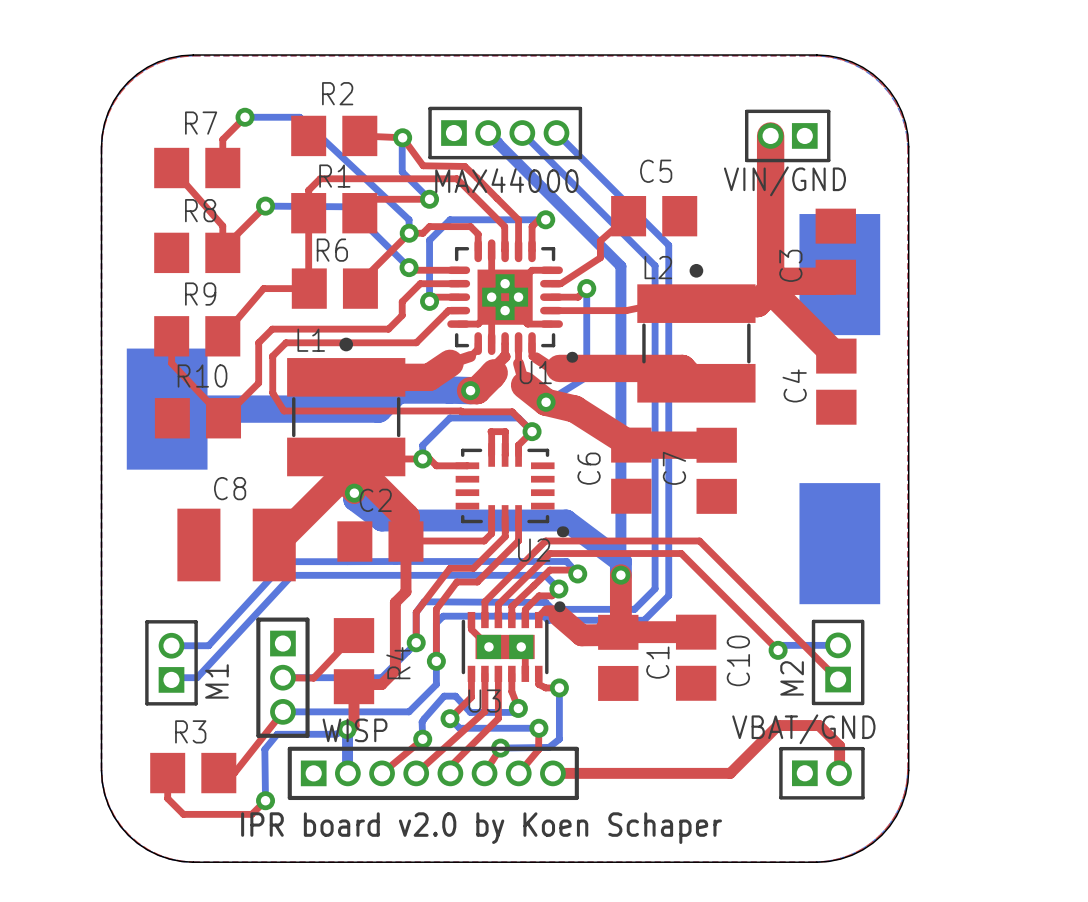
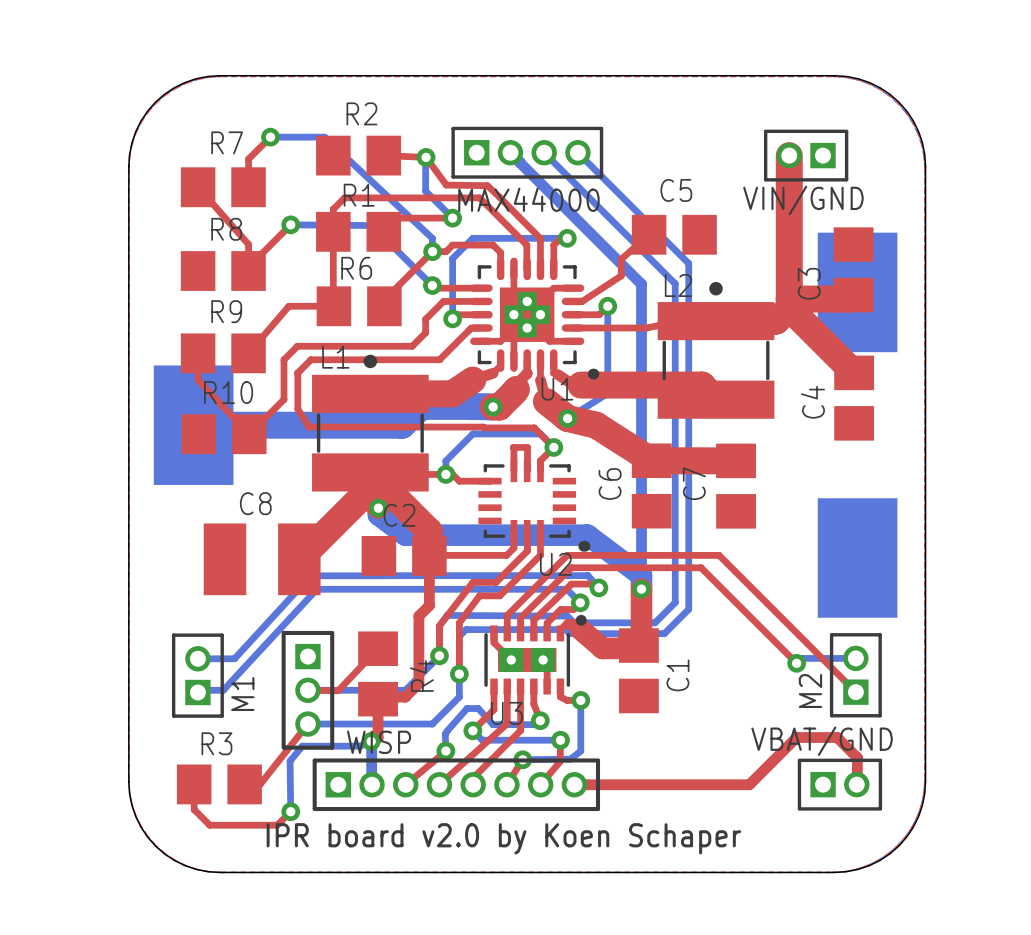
top track: (696, 632) (623, 632) (620, 635) -> none
C10: (696, 657) -> none

